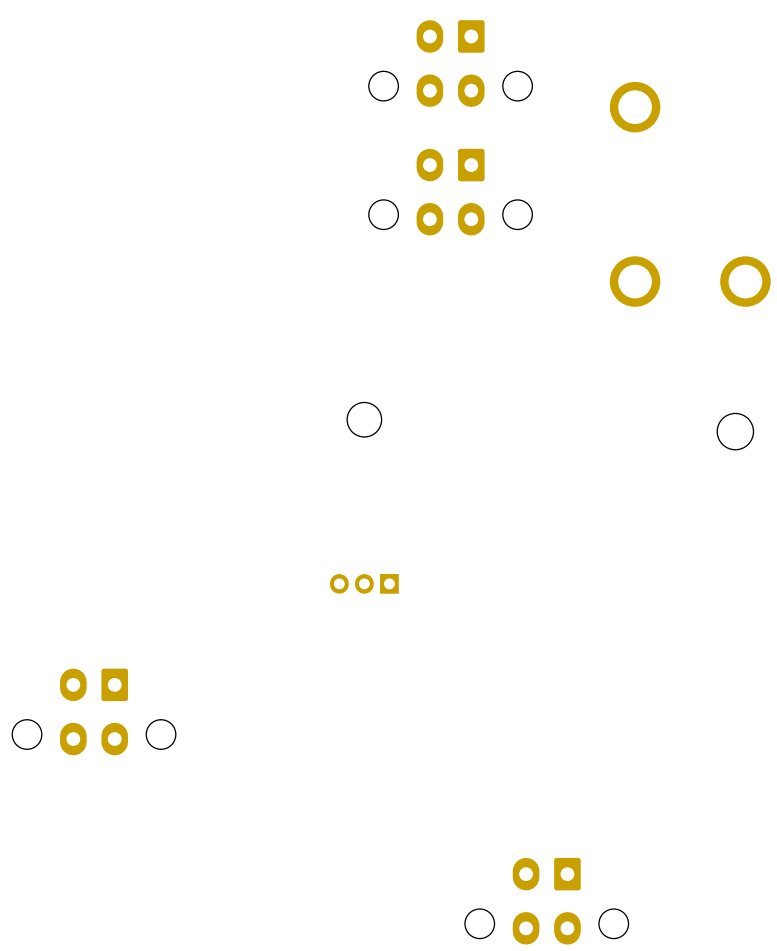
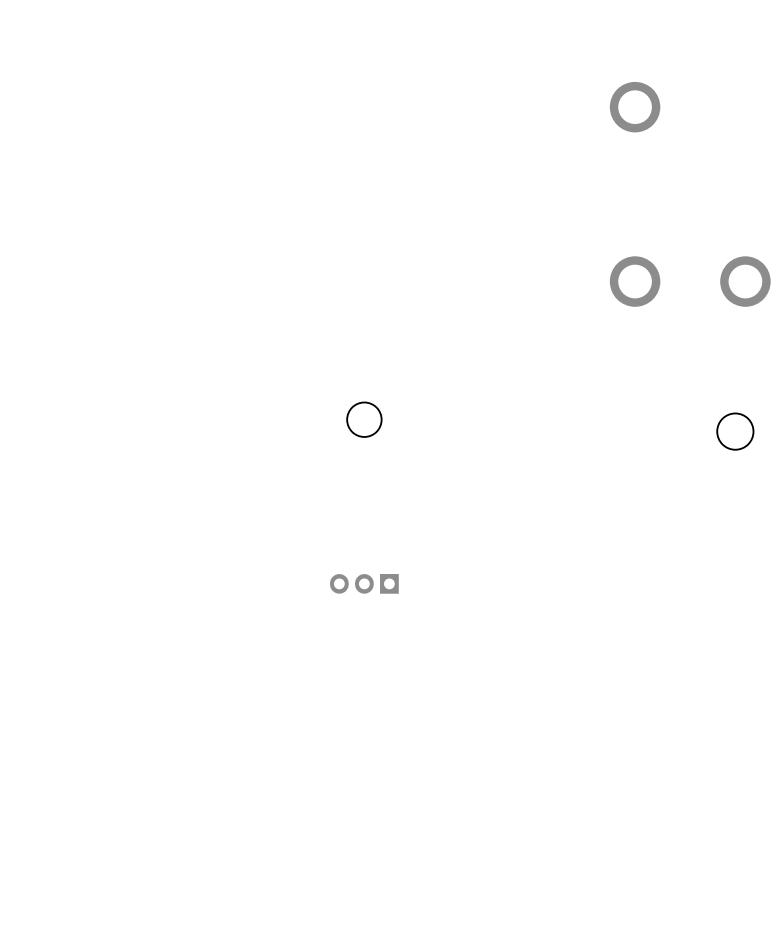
part: (450, 63) -> none
part: (450, 192) -> none
part: (94, 711) -> none
part: (546, 901) -> none

